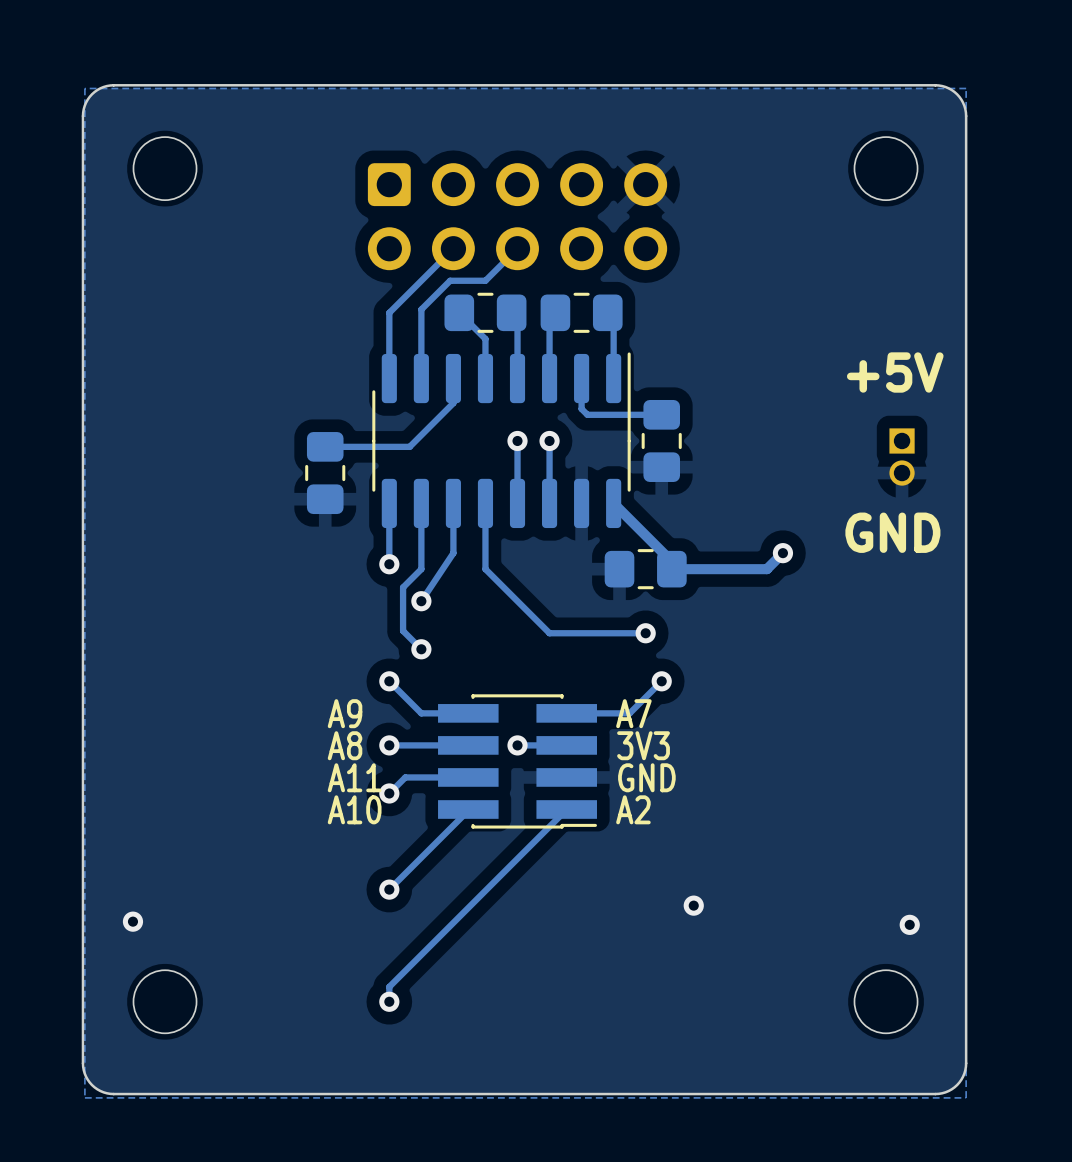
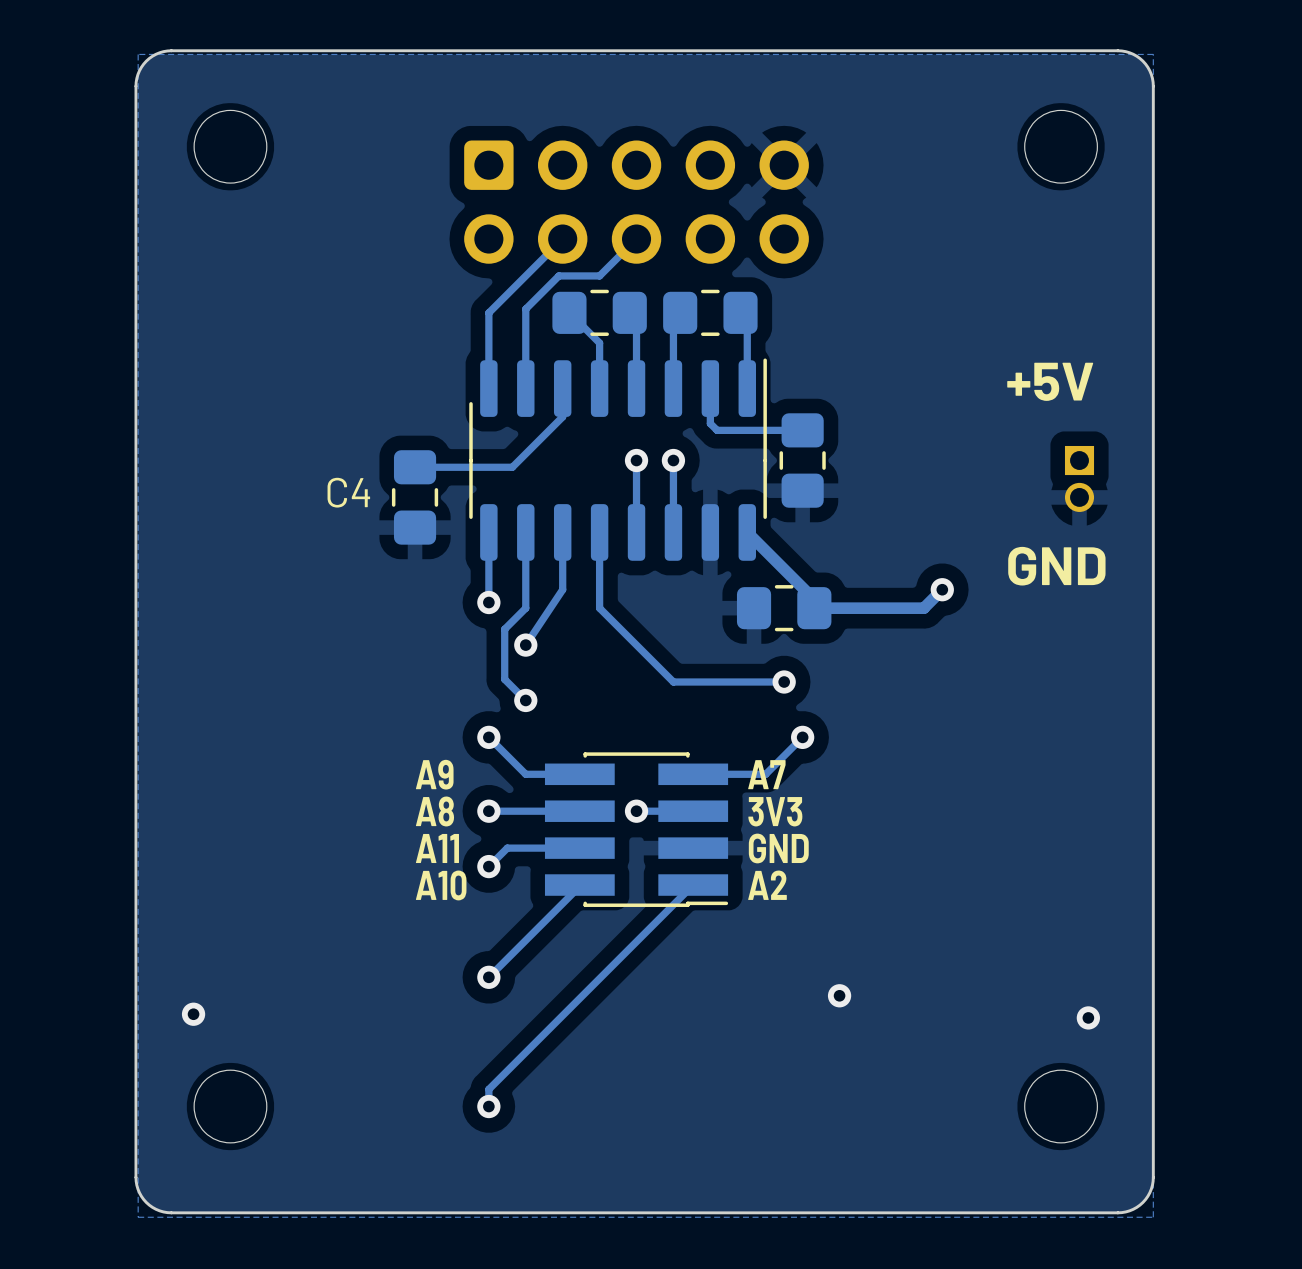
C4 name: none -> C4 (348, 492)

